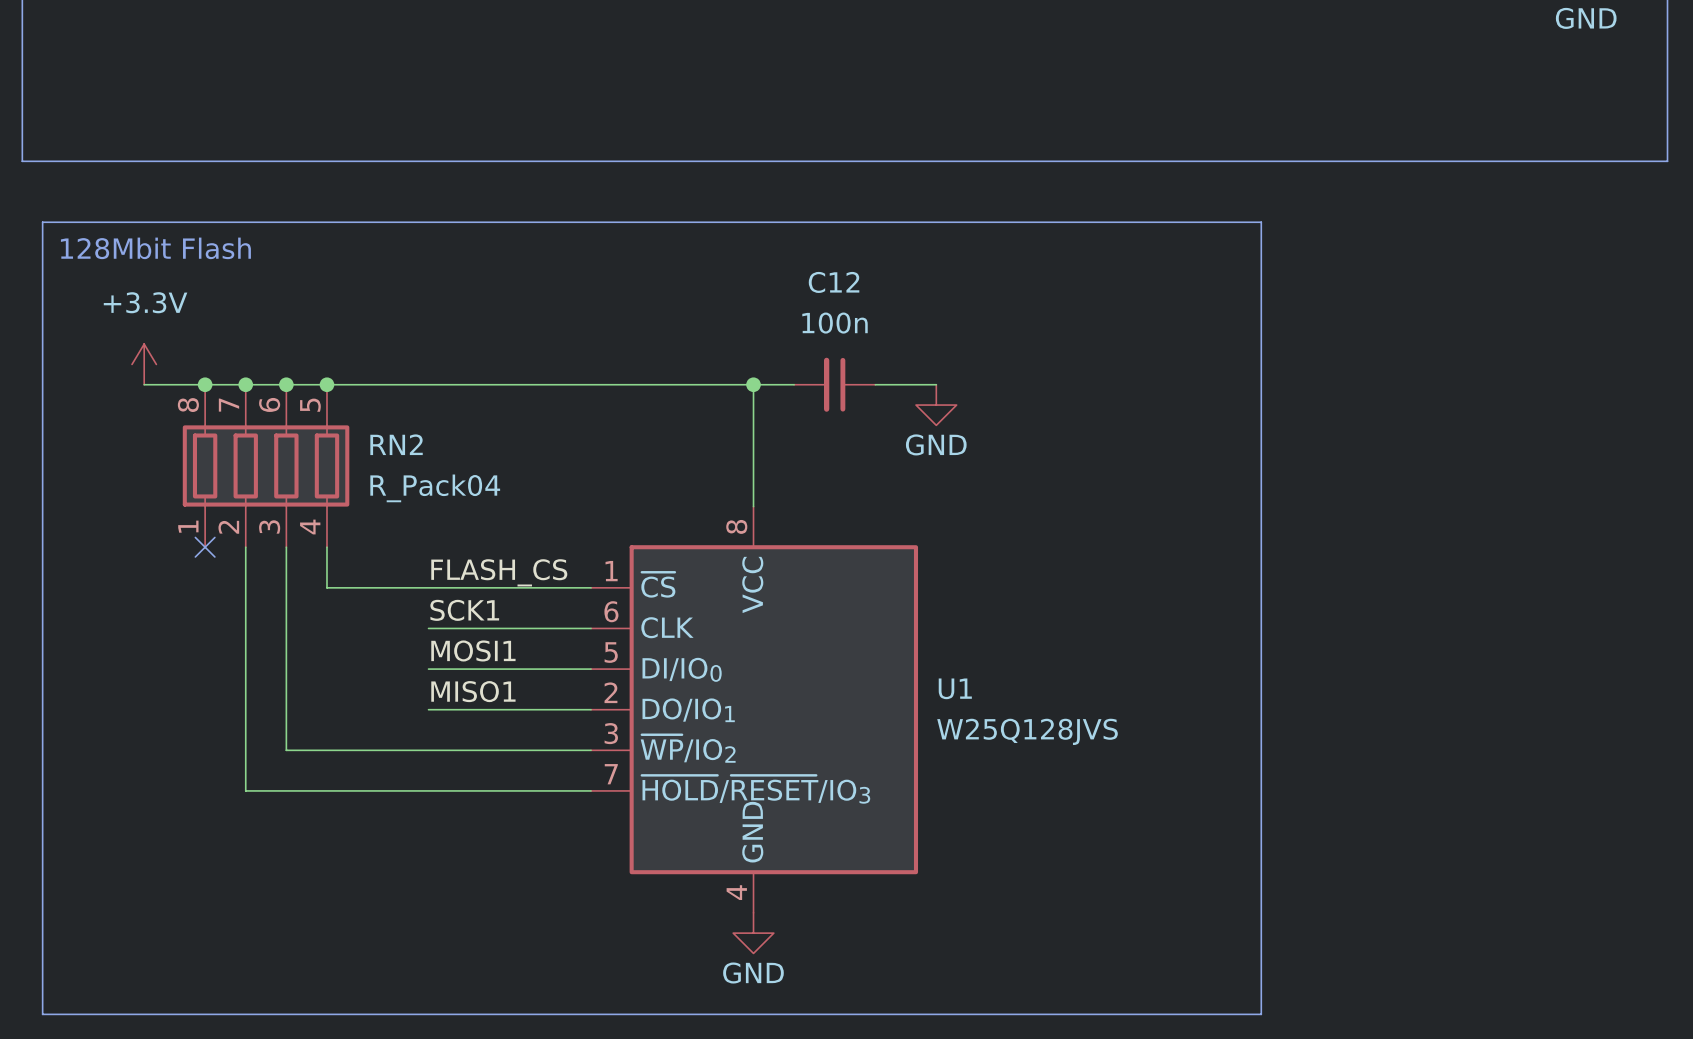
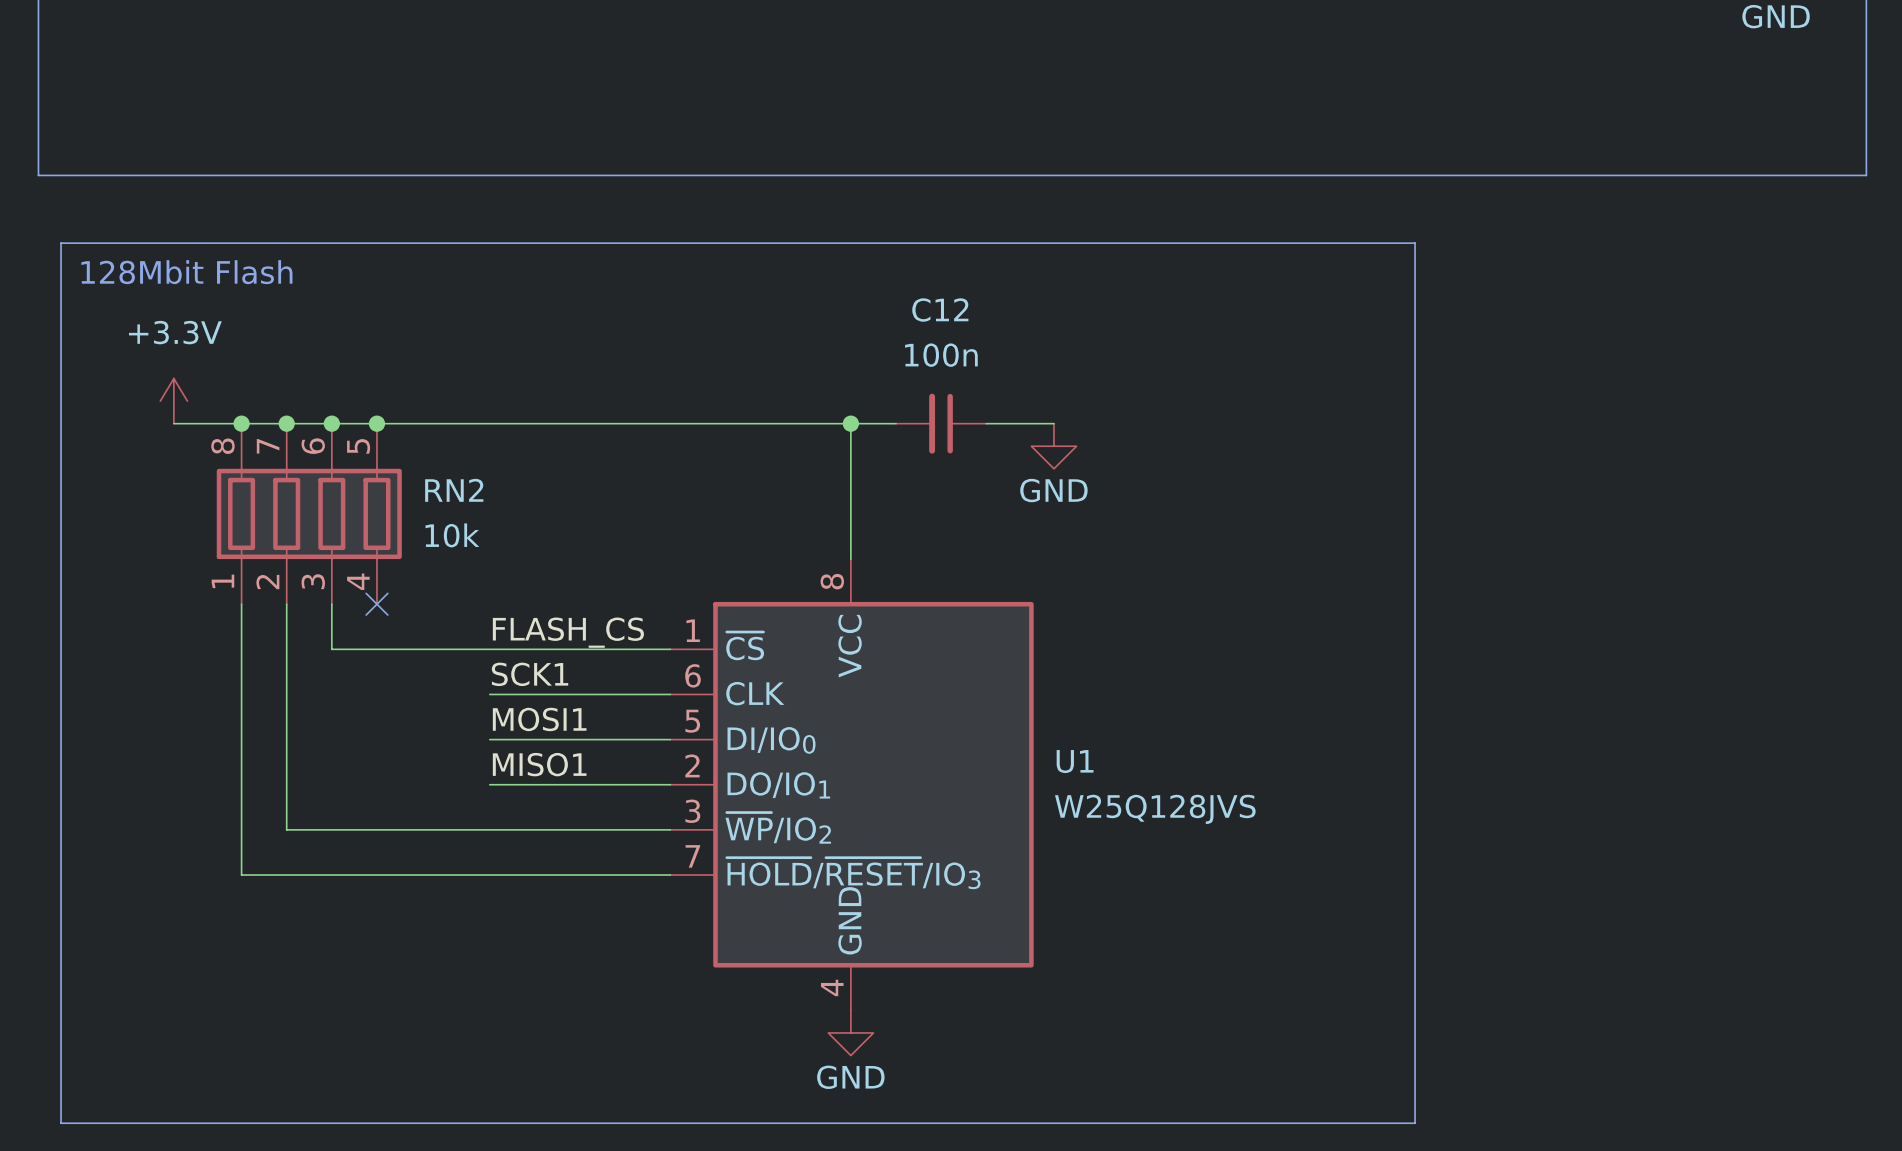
RN2 value: R_Pack04 (435, 488) -> 10k (452, 535)
wire: none -> (241, 604) (241, 875) (286, 875)
no-connect mark: (205, 547) -> none
wire: (326, 547) (326, 587) -> (331, 649) (376, 649)
no-connect mark: none -> (376, 604)
wire: (286, 587) (286, 750) -> none
wire: (245, 750) (245, 790) -> (286, 829) (331, 829)

